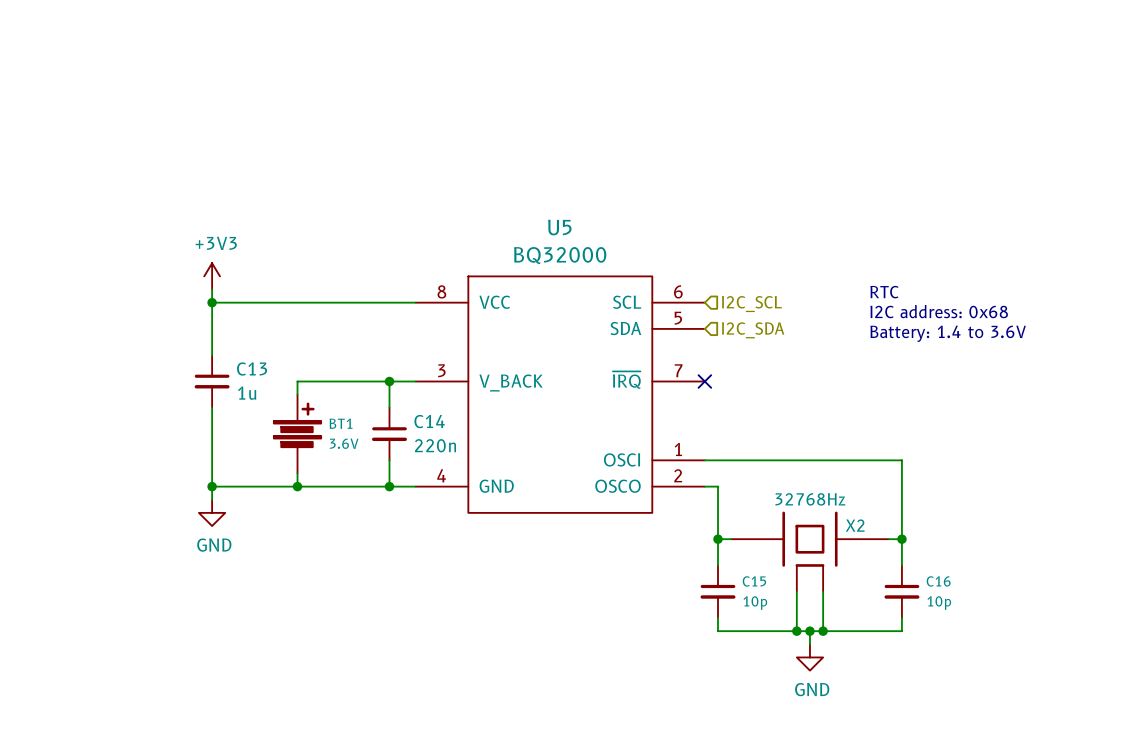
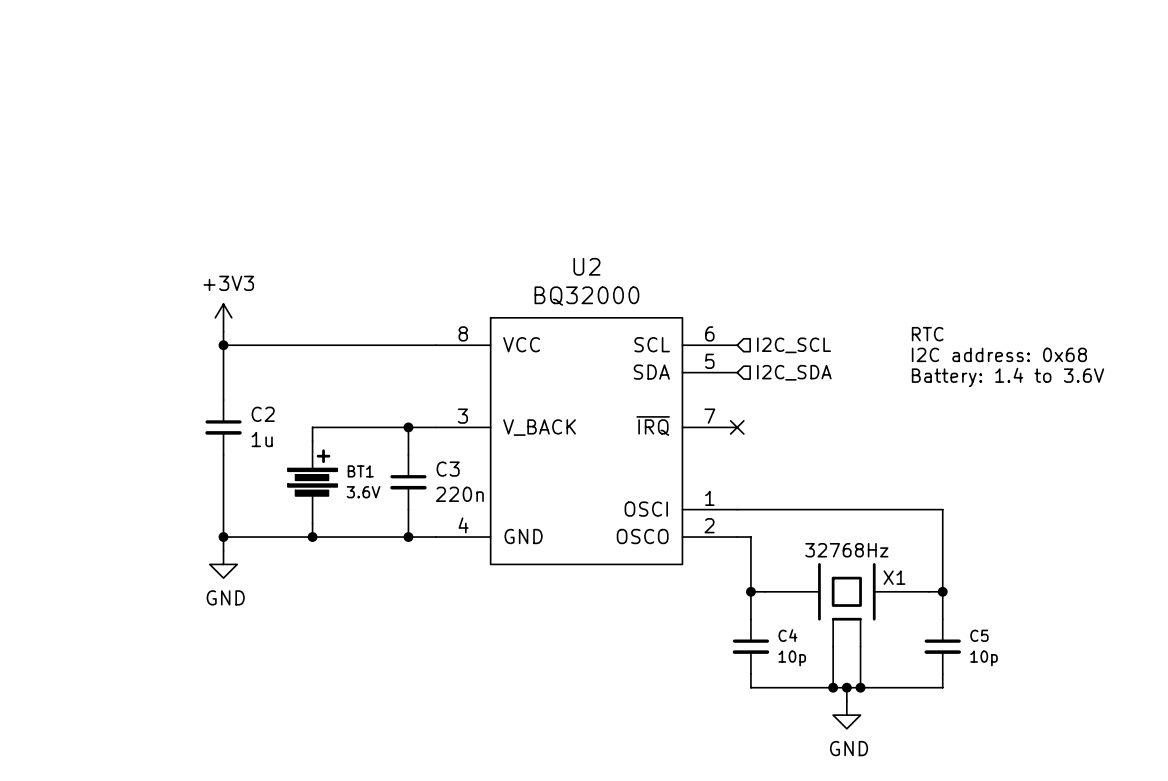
U5 name: U5 (559, 227) -> U2 (586, 266)
C13 name: C13 (252, 368) -> C2 (263, 414)
C14 name: C14 (429, 421) -> C3 (448, 469)
X2 name: X2 (855, 525) -> X1 (894, 577)
C15 name: C15 (754, 581) -> C4 (787, 635)
C16 name: C16 (938, 581) -> C5 (979, 635)

